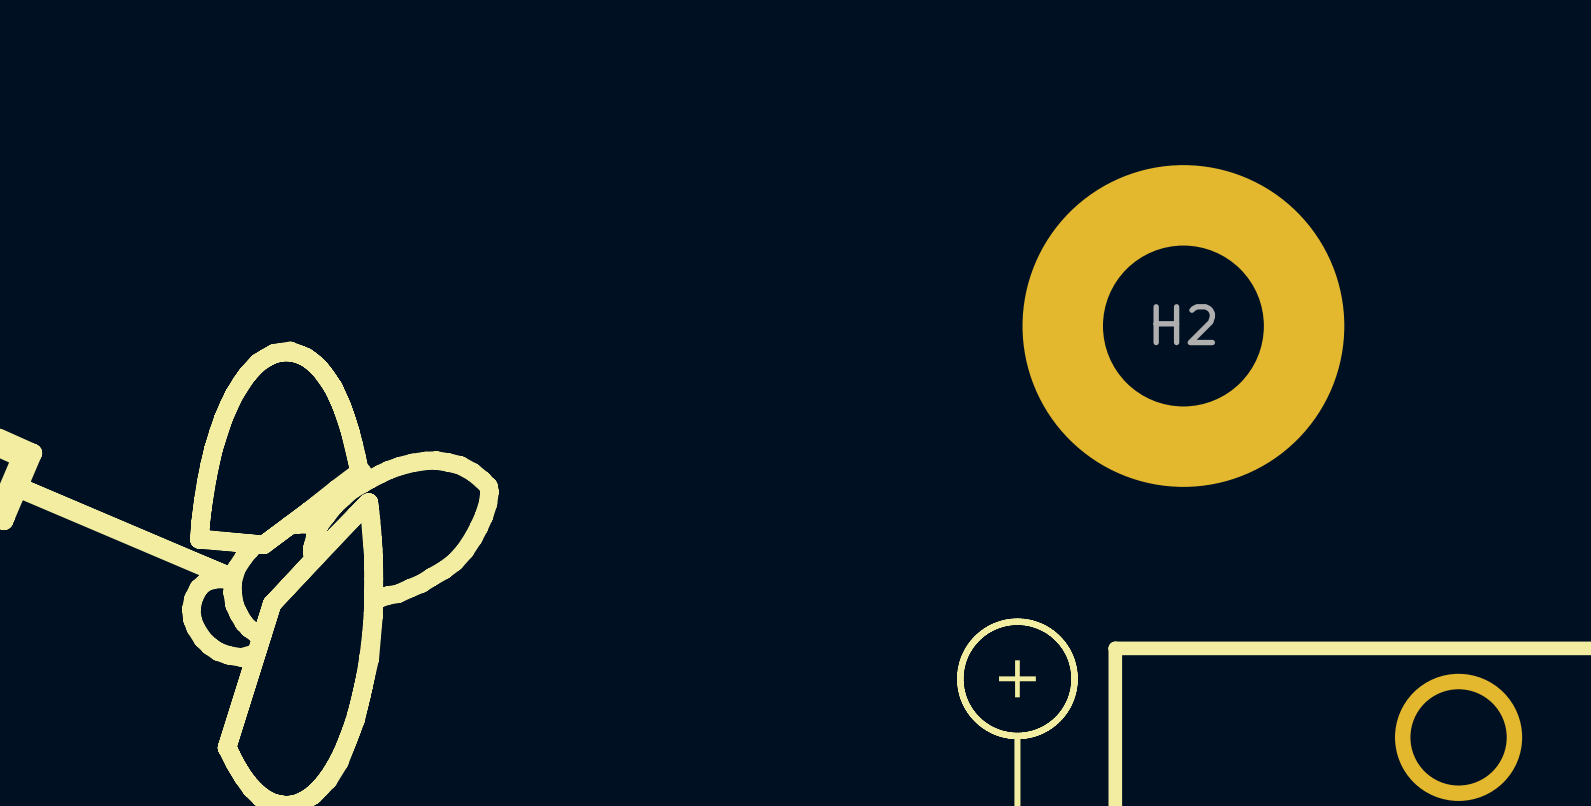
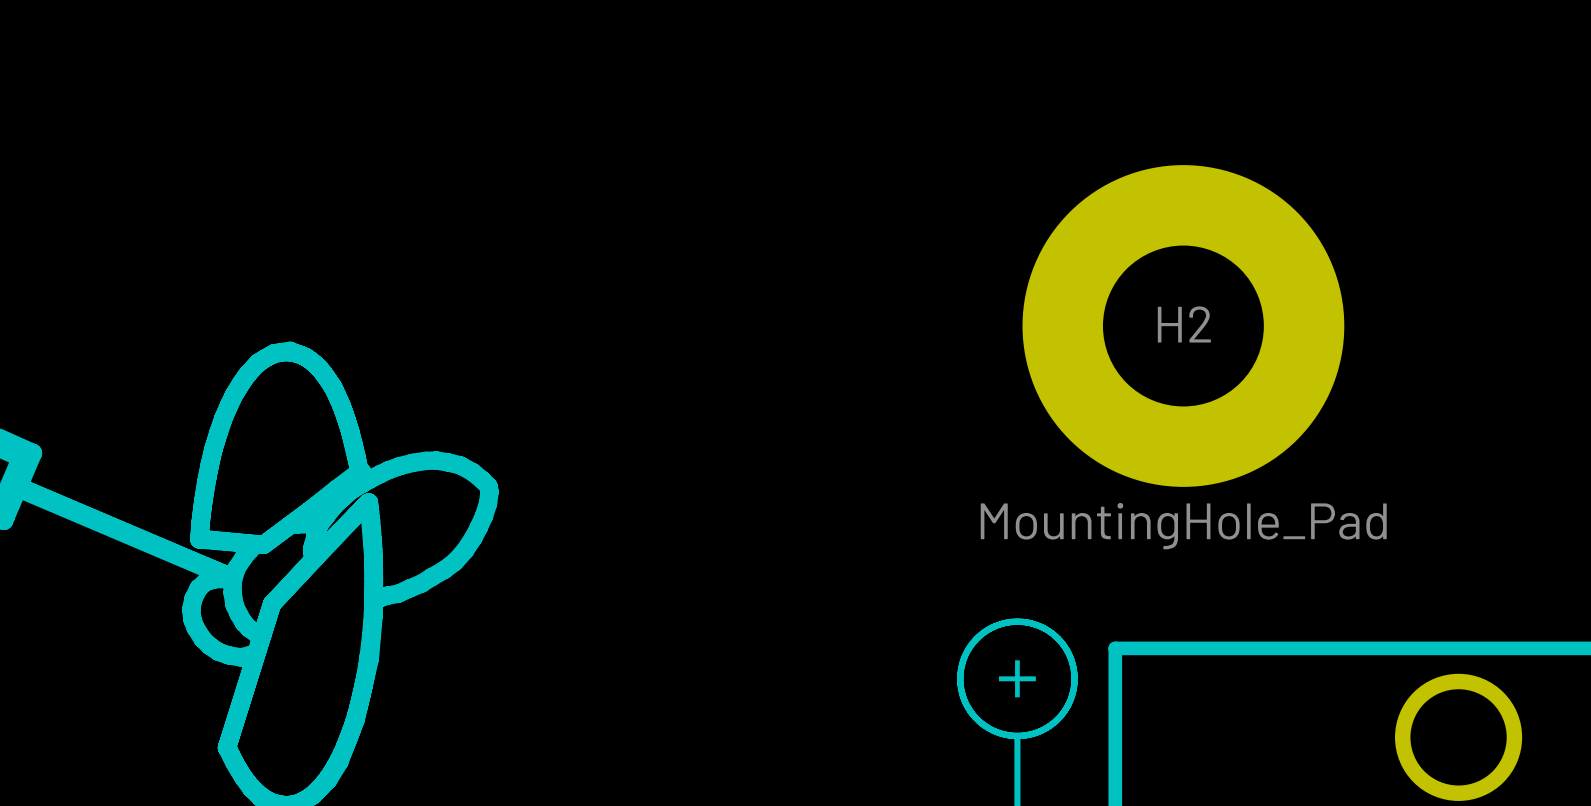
H2 value: none -> MountingHole_Pad (1183, 526)

